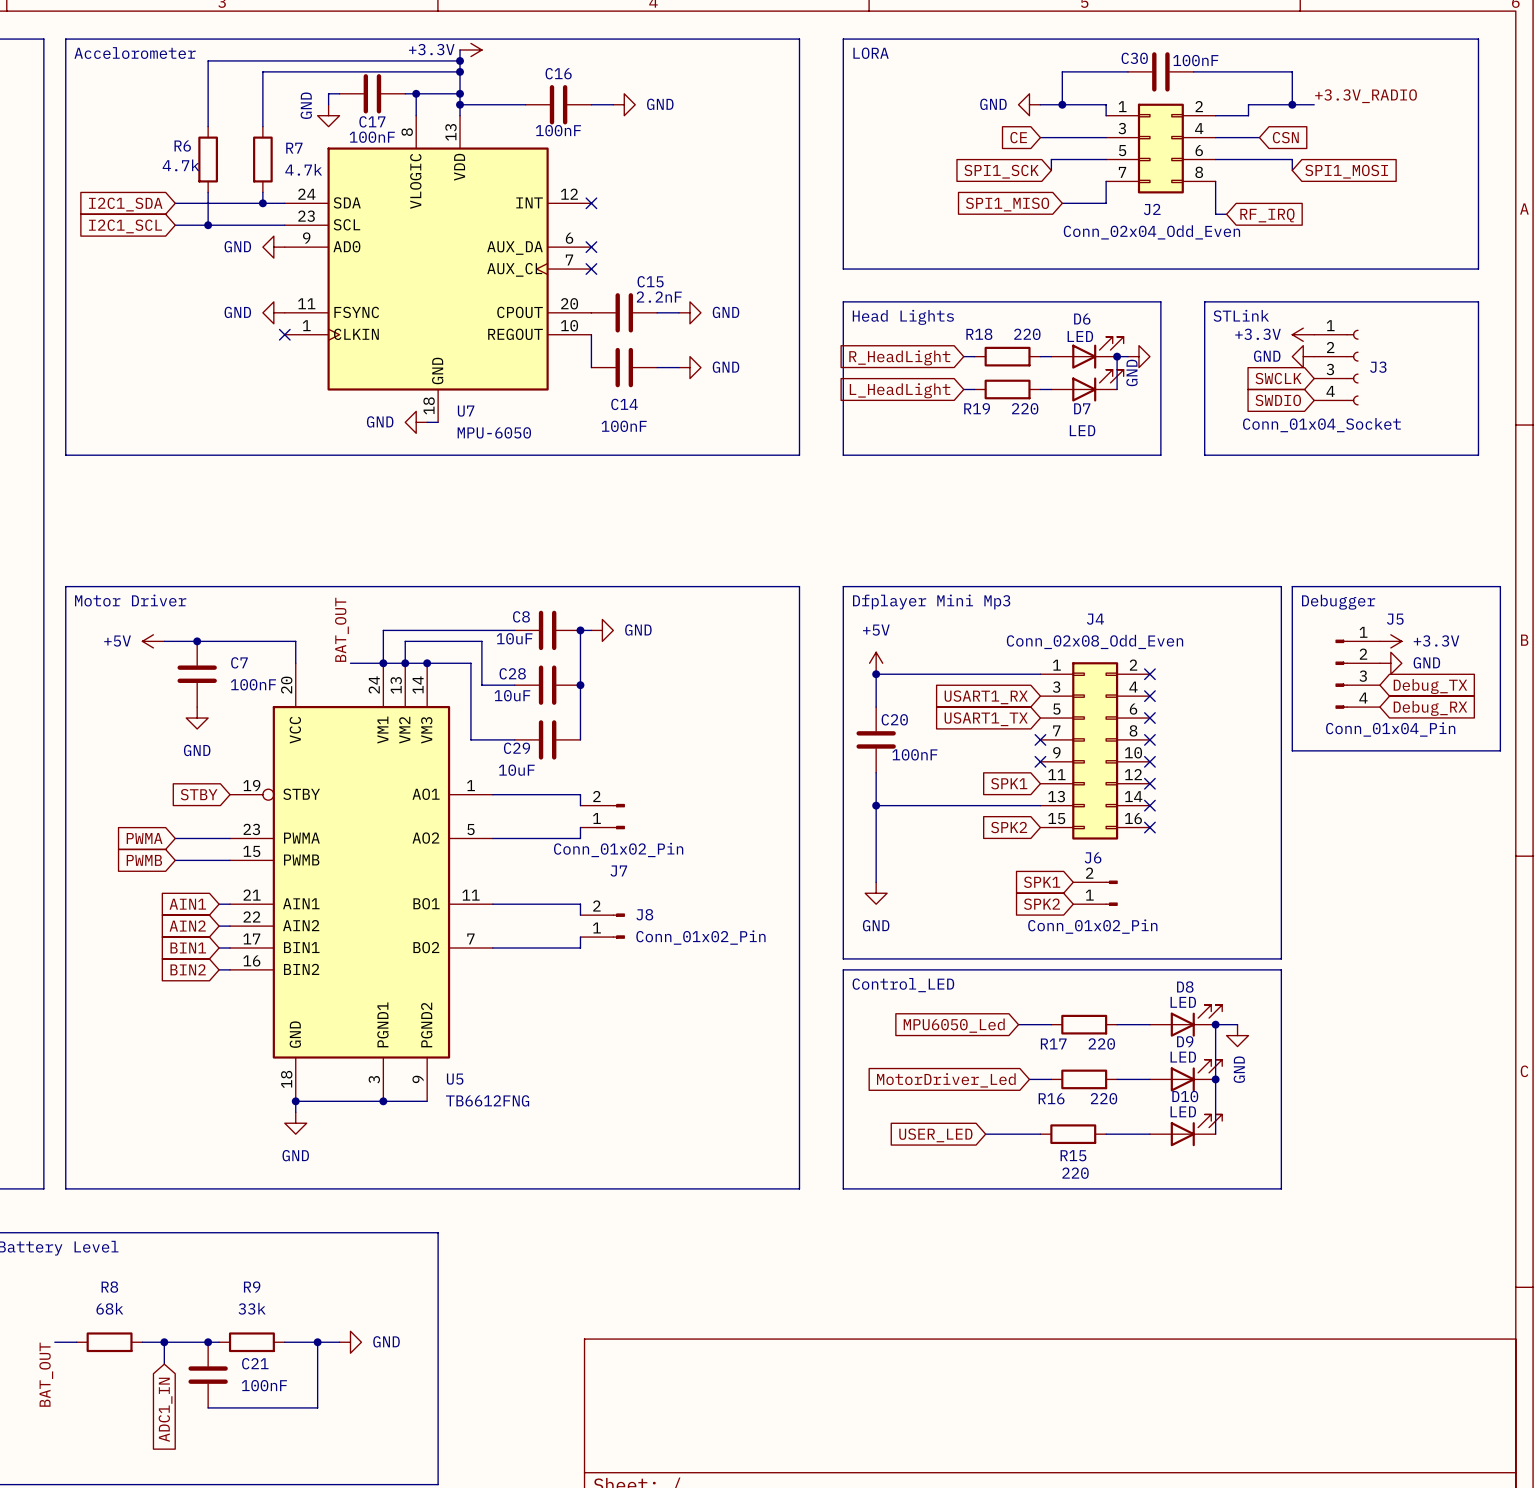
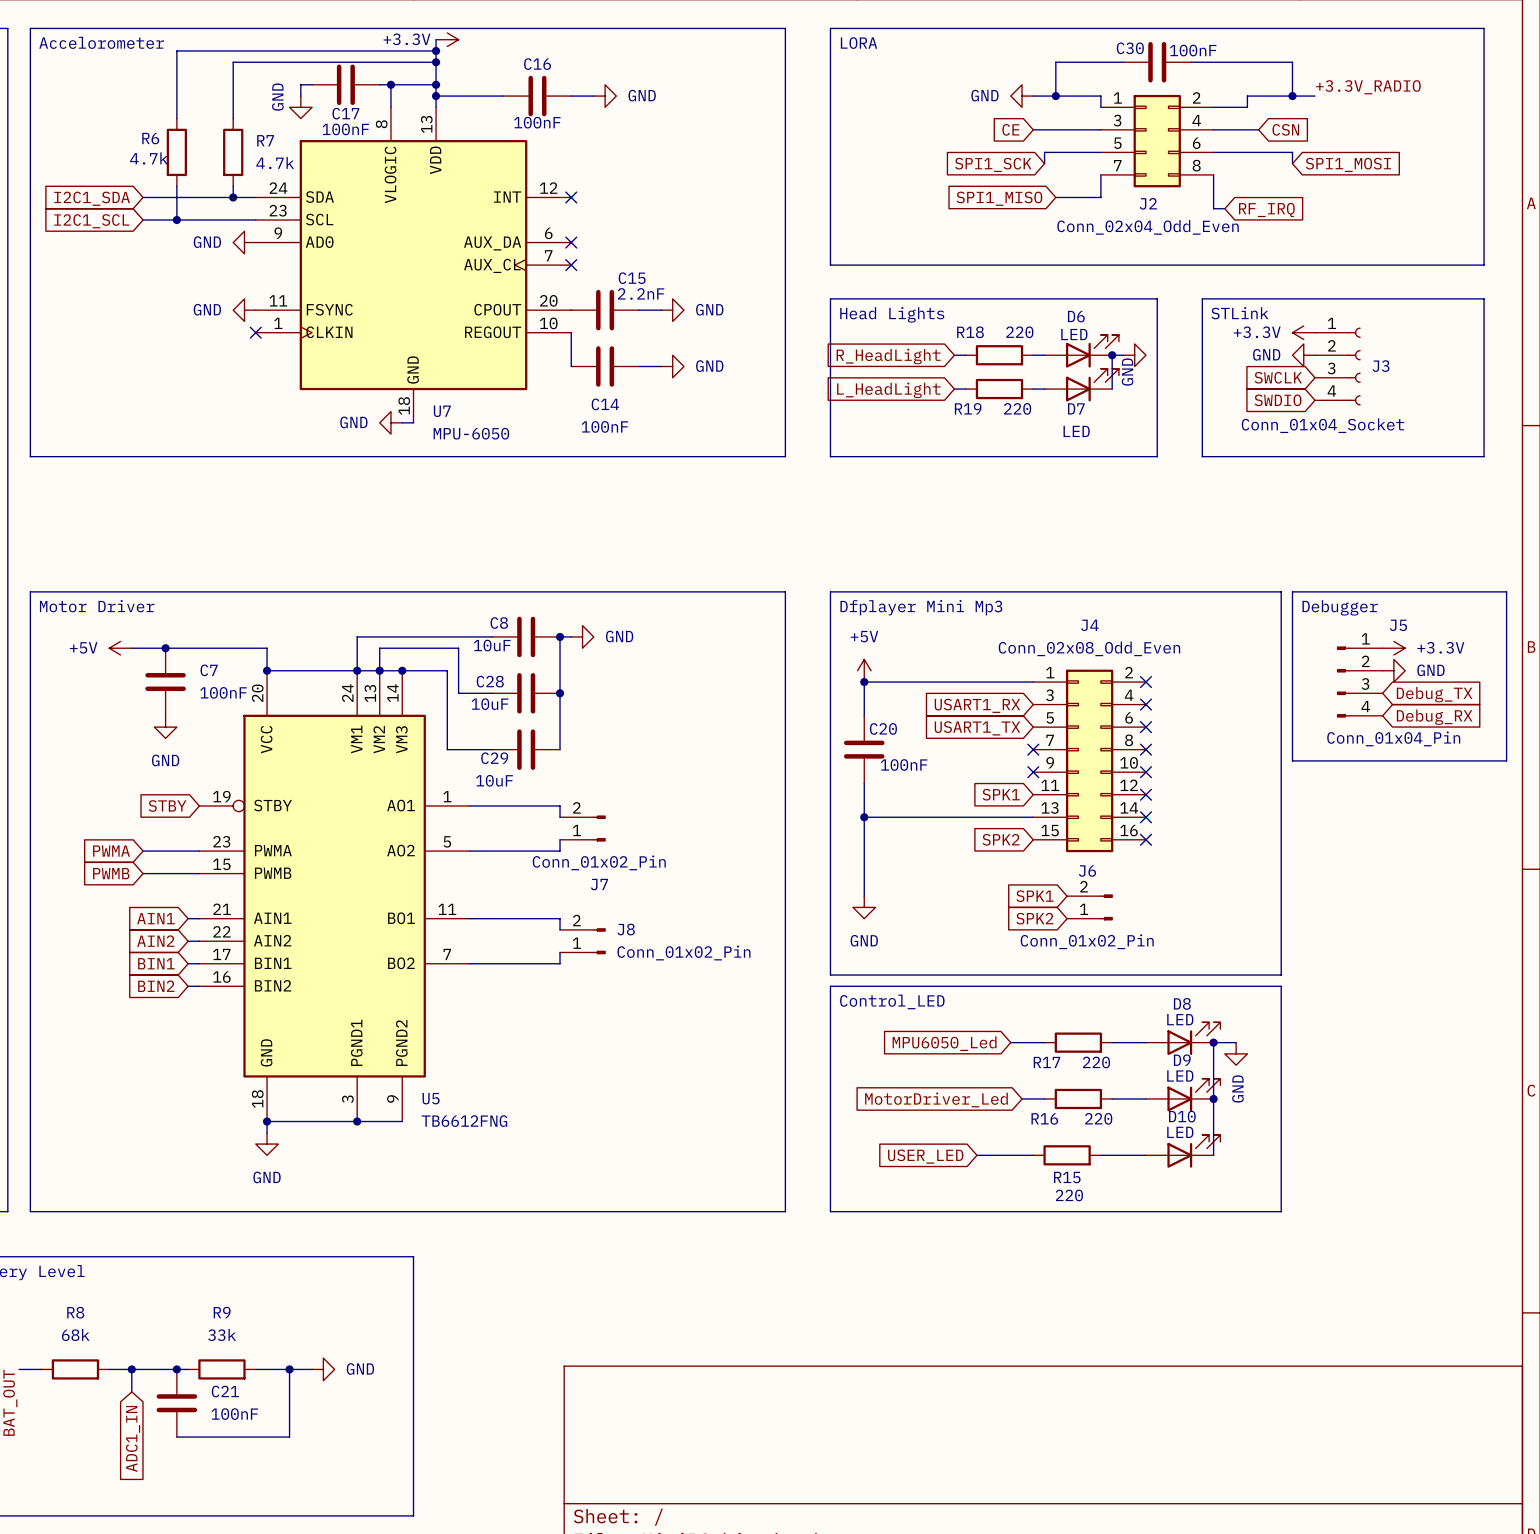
label: BAT_OUT (341, 629) -> none
wire: none -> (267, 670) (323, 670)
junction: none -> (267, 670)

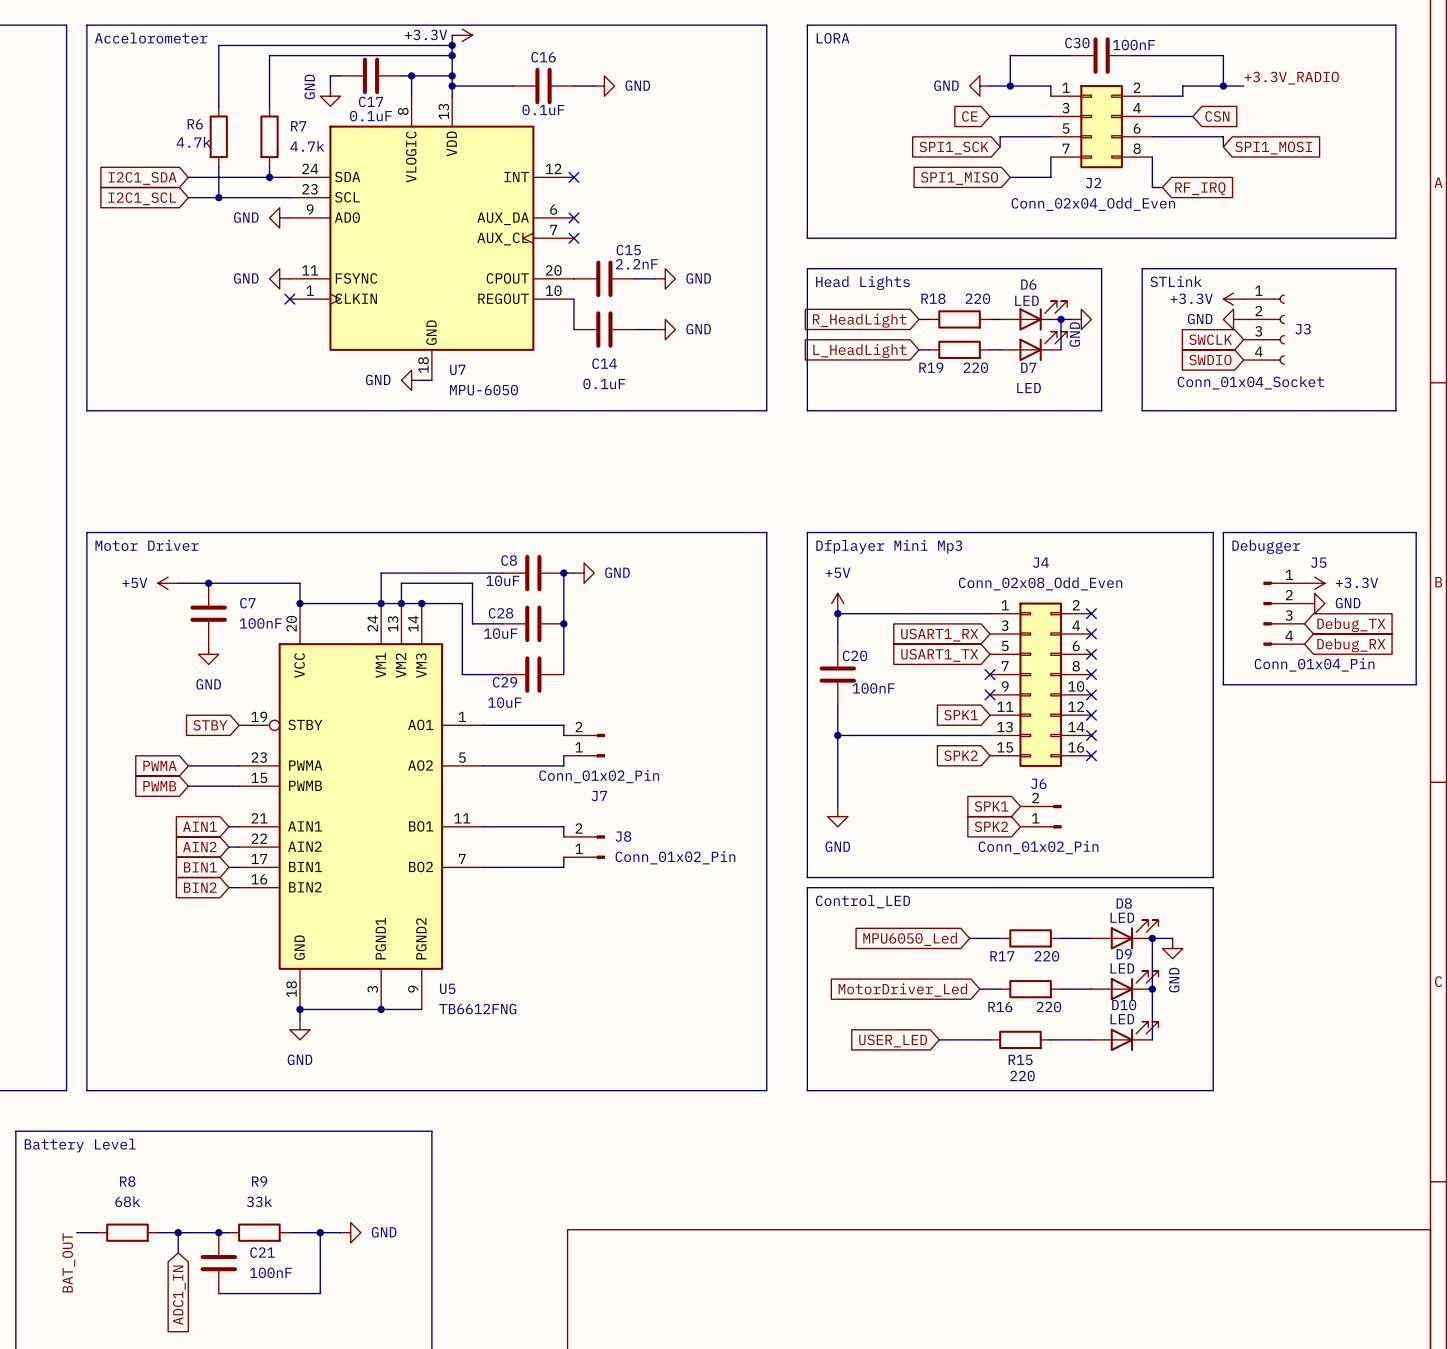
C16 value: 100nF (537, 122) -> 0.1uF (543, 110)
C17 value: 100nF (345, 129) -> 0.1uF (370, 116)
C14 value: 100nF (604, 426) -> 0.1uF (604, 383)

